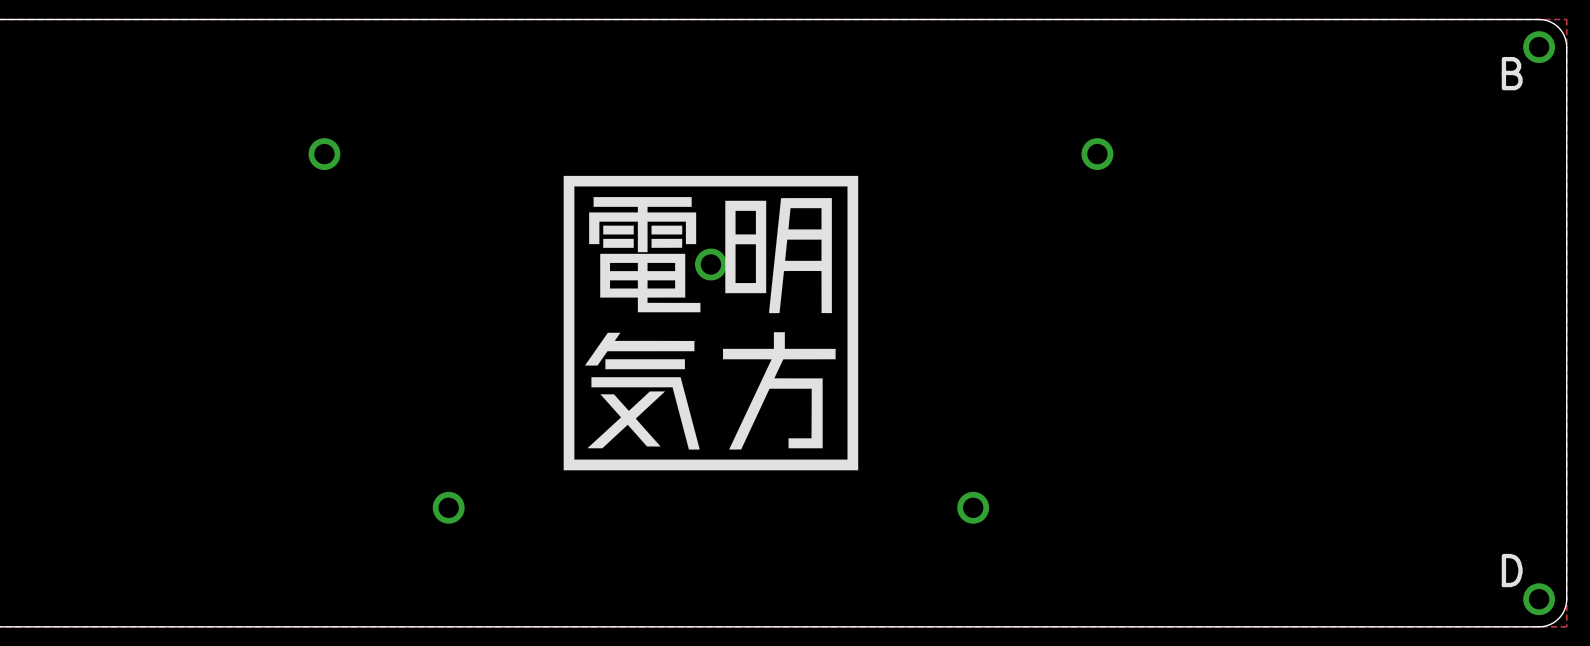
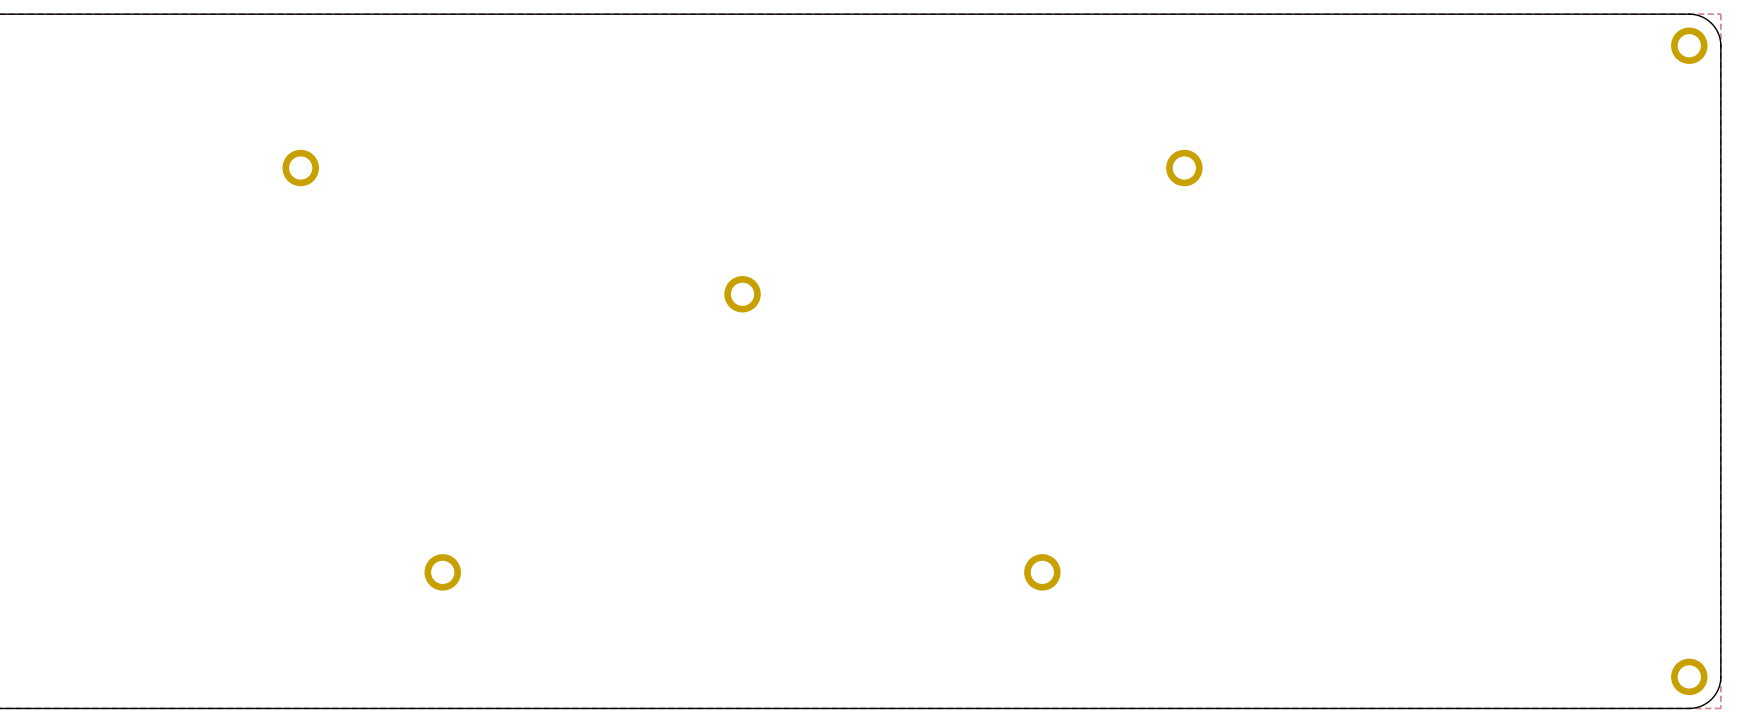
text: B (1512, 73) -> none
drawing: [563, 175, 859, 471] -> none
text: D (1512, 570) -> none

